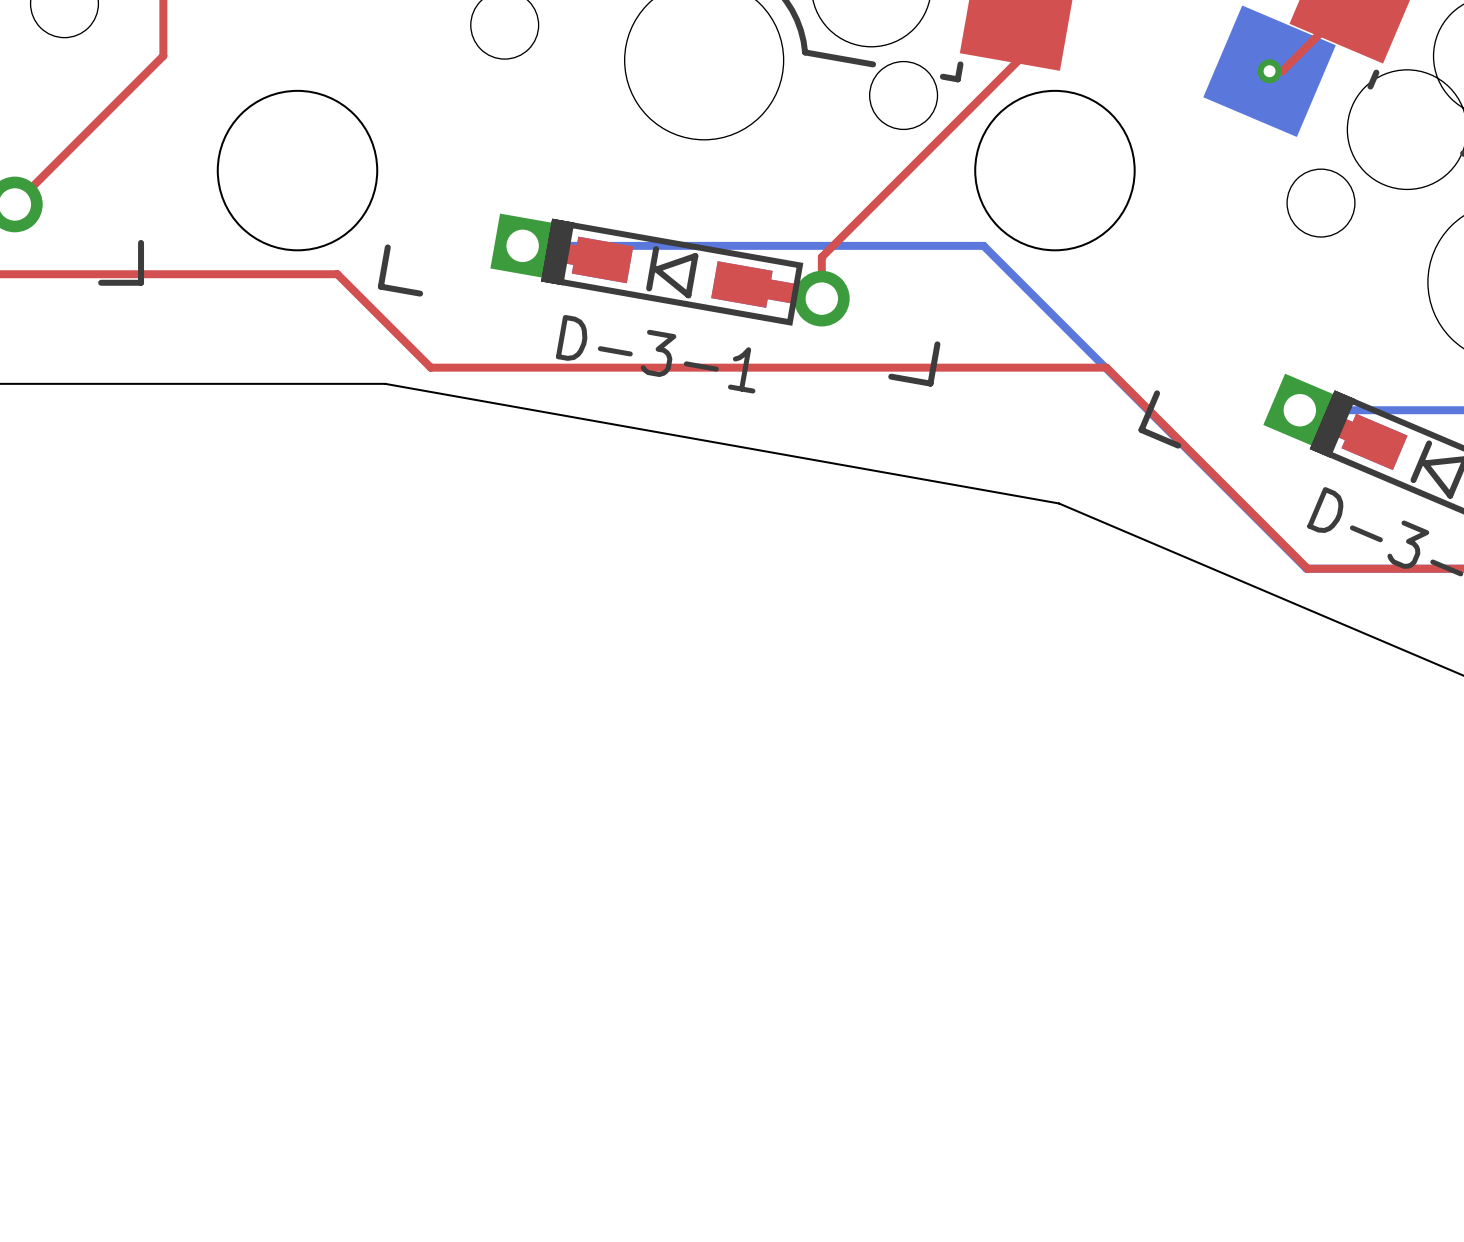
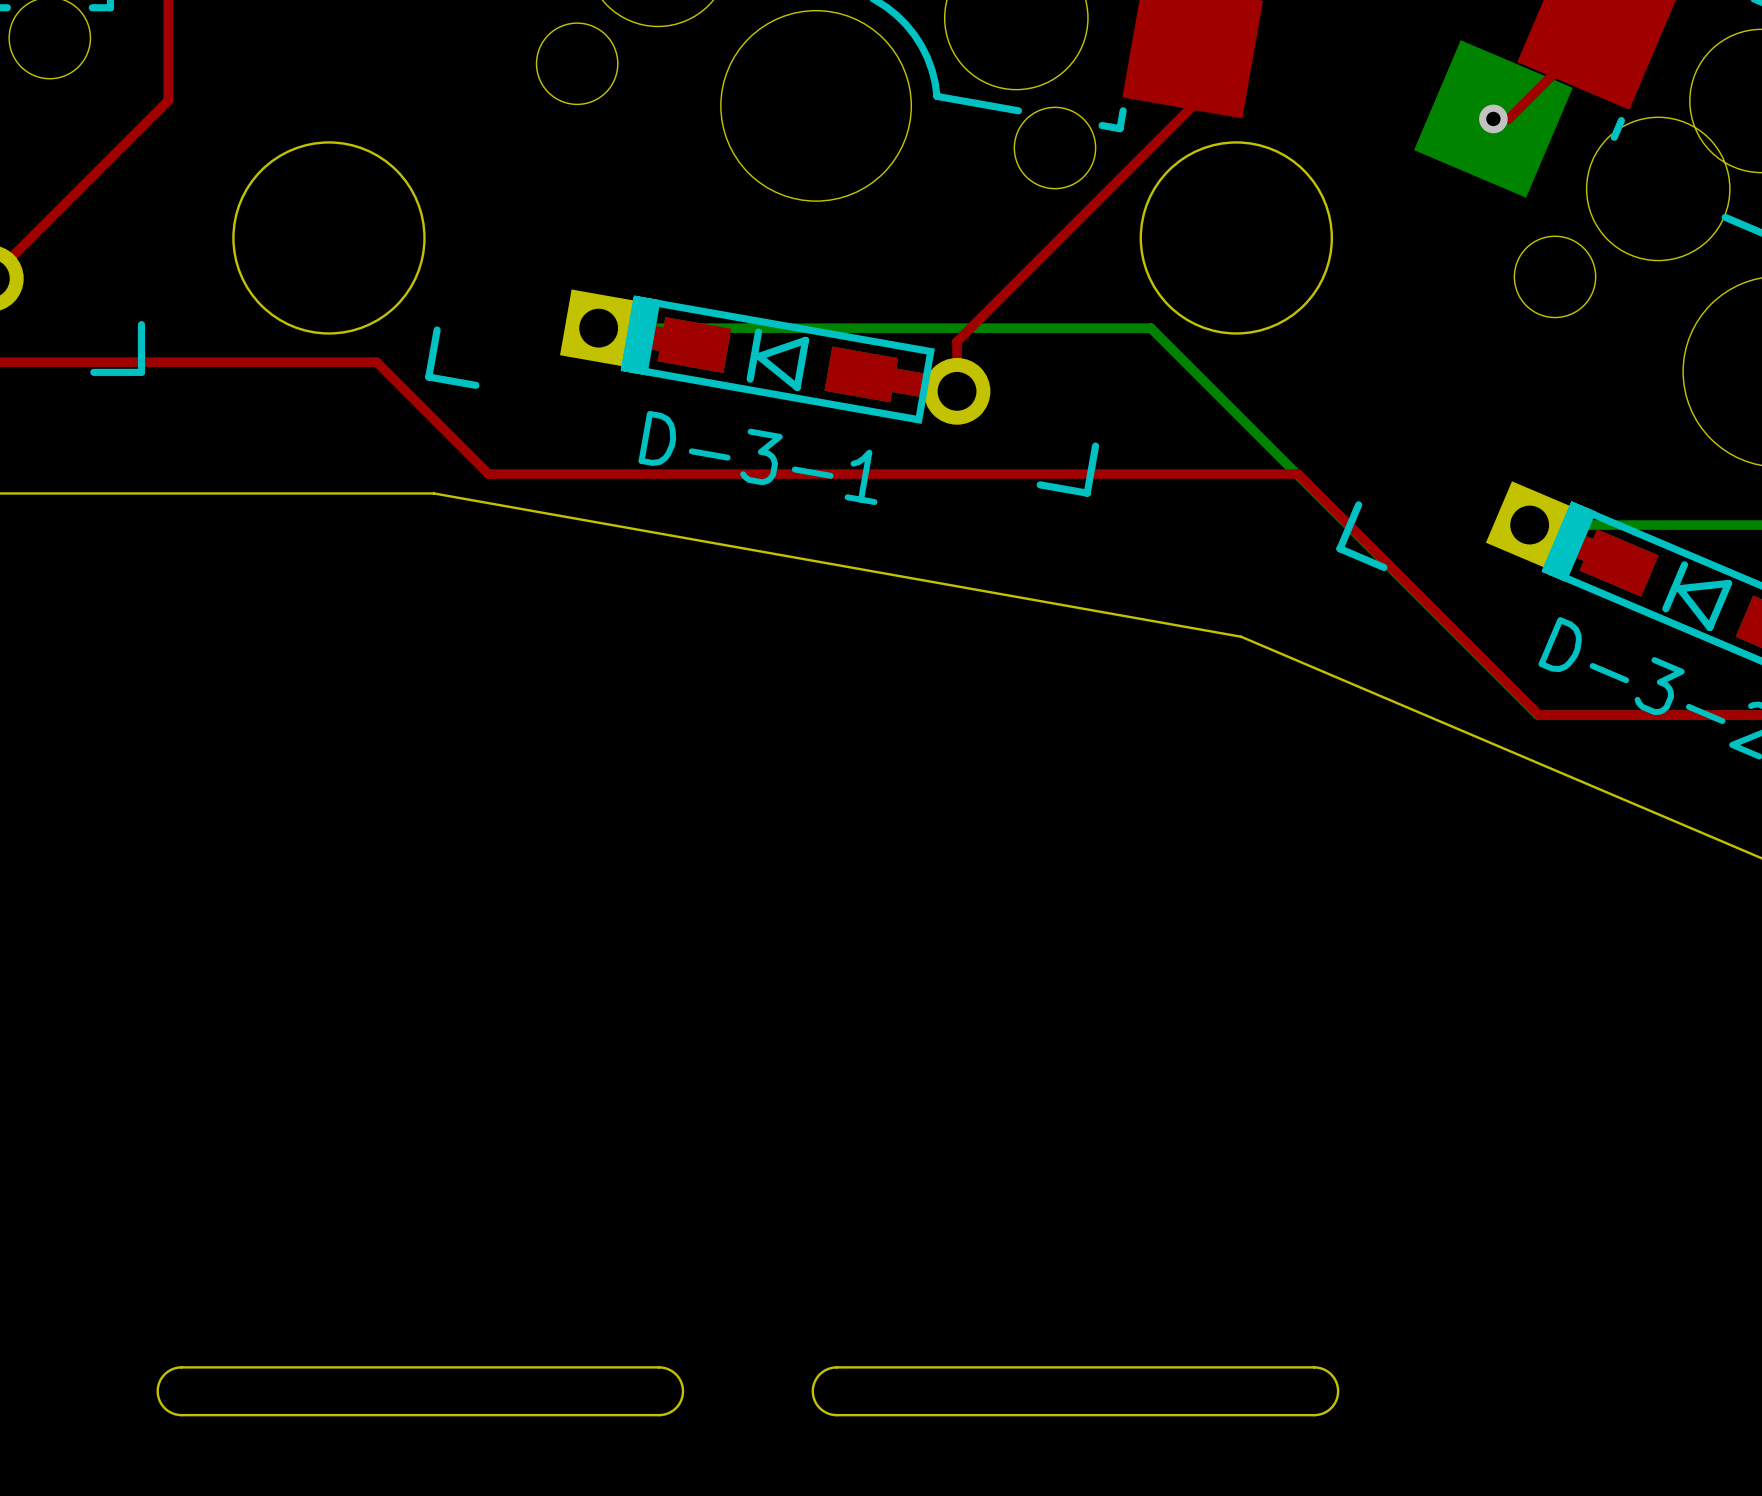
board edge: none -> (181, 1367) (659, 1367) (668, 1369) (676, 1374) (681, 1382) (683, 1391) (681, 1400) (676, 1408) (668, 1413) (659, 1415) (181, 1415) (173, 1413) (165, 1409) (160, 1402) (157, 1391) (160, 1380) (165, 1373) (173, 1368) (181, 1367)
board edge: none -> (836, 1367) (1314, 1367) (1325, 1370) (1332, 1375) (1336, 1382) (1338, 1391) (1335, 1402) (1330, 1409) (1322, 1413) (1314, 1415) (836, 1415) (827, 1413) (819, 1408) (814, 1400) (812, 1391) (814, 1382) (819, 1374) (827, 1369) (836, 1367)

